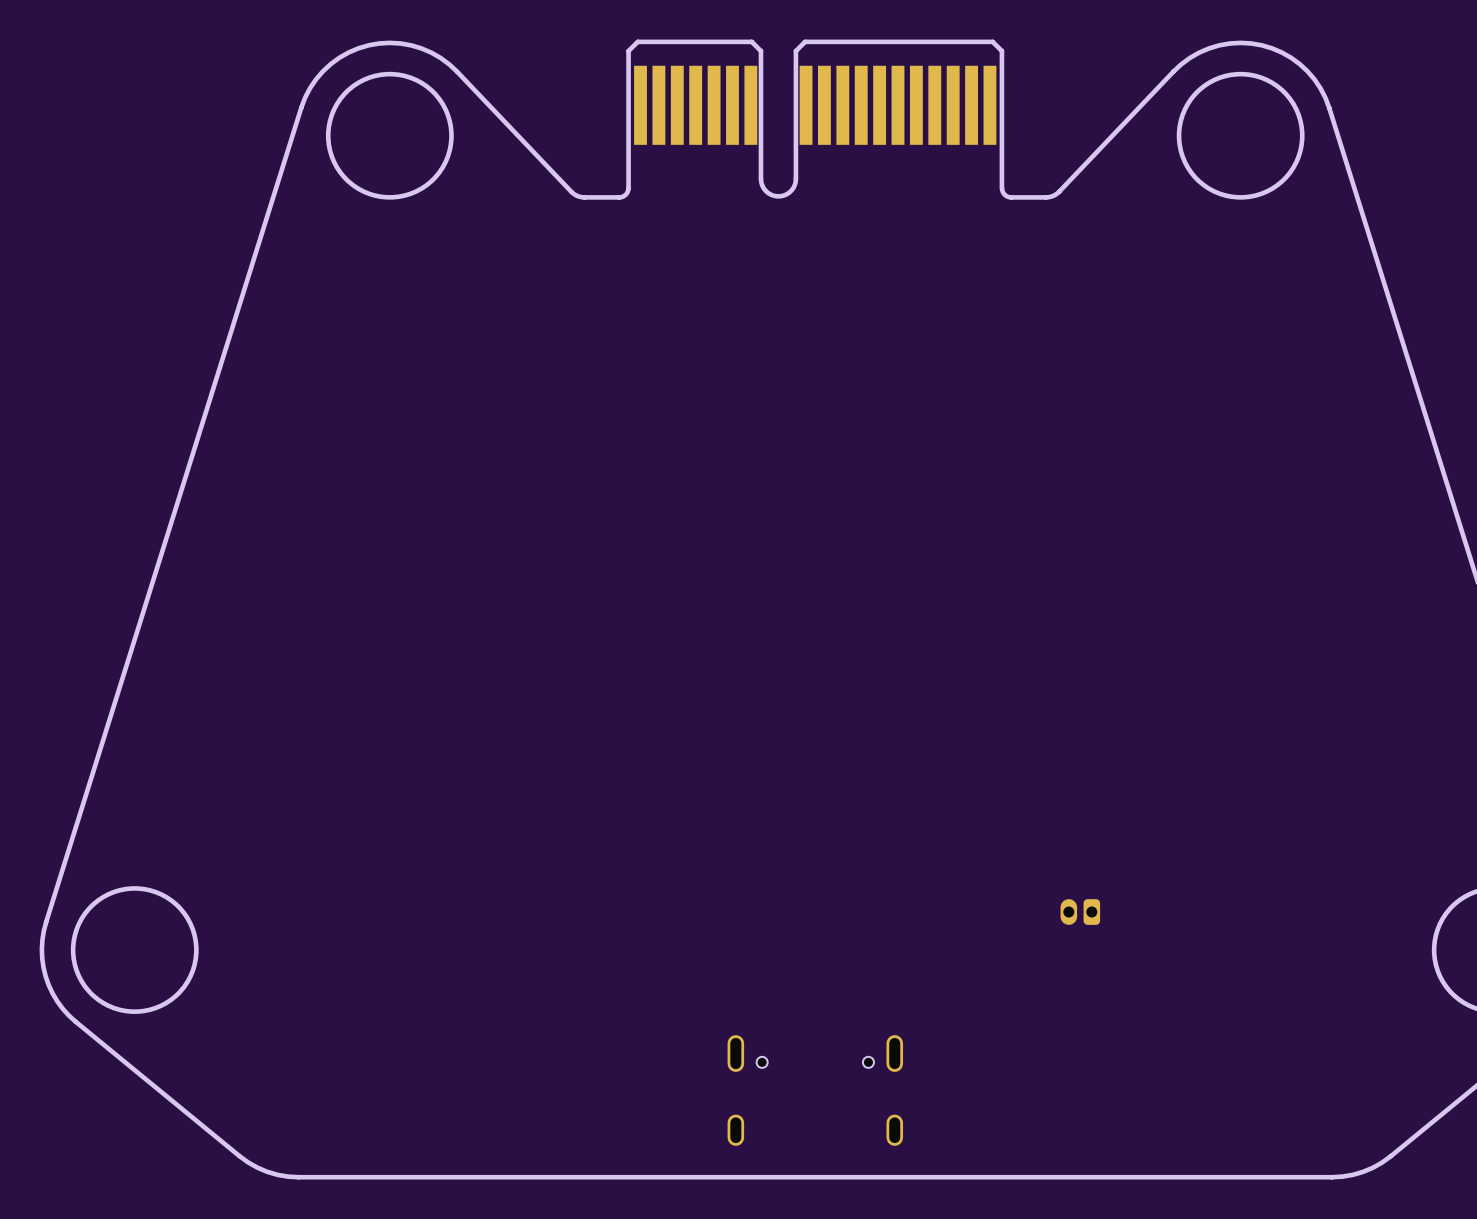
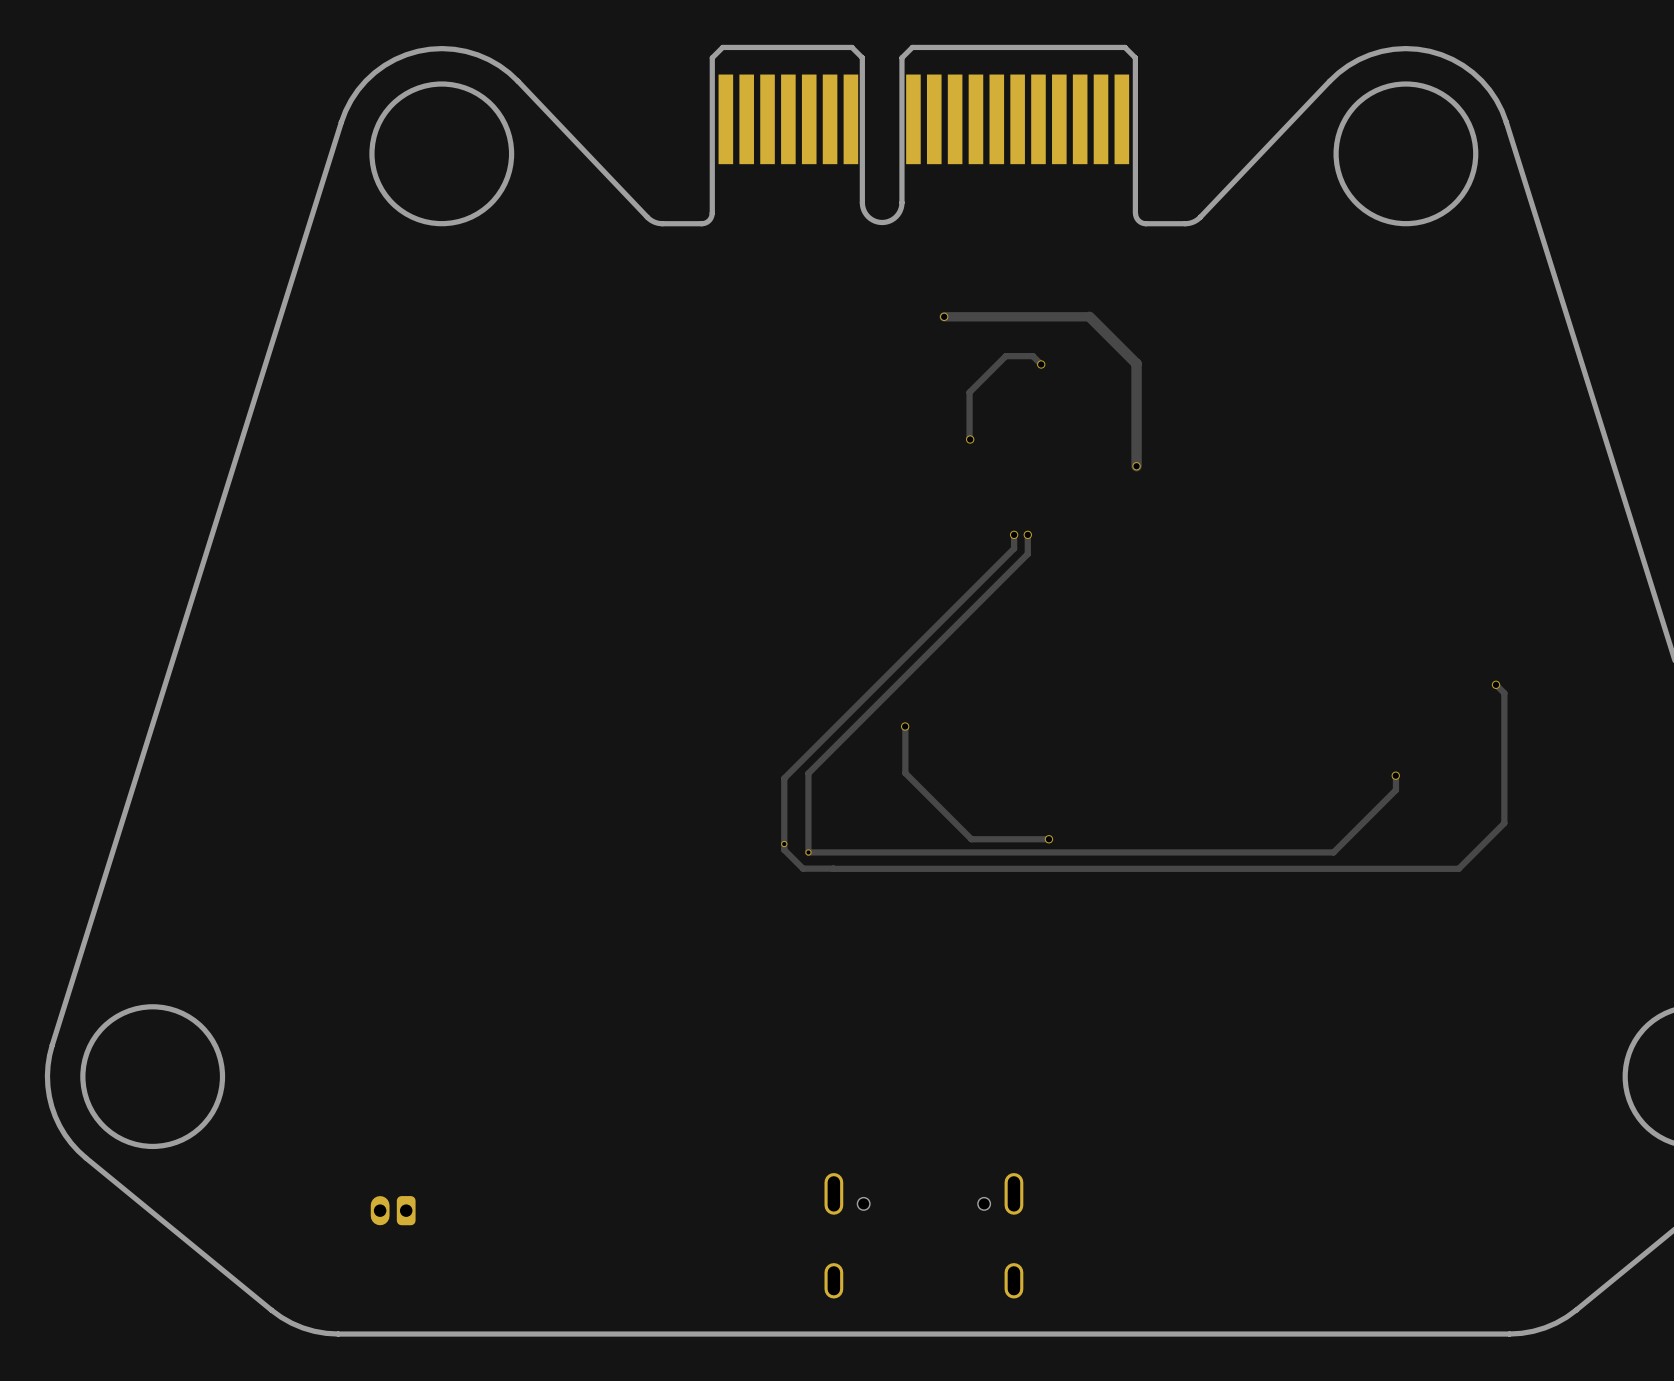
track: none -> (944, 316) (1089, 316) (1136, 363) (1136, 466)
via: none -> (944, 316)
track: none -> (1041, 364) (1032, 356) (1005, 356) (969, 392) (970, 439)
via: none -> (1041, 364)
via: none -> (970, 439)
via: none -> (1136, 466)
track: none -> (1014, 534) (1014, 548) (784, 778) (784, 849) (803, 868) (833, 868)
via: none -> (1014, 534)
track: none -> (1027, 534) (1027, 554) (808, 773) (808, 852) (1333, 852) (1395, 790) (1395, 778)
via: none -> (1027, 534)
track: none -> (1496, 684) (1504, 693) (1504, 823) (1458, 868) (833, 868)
via: none -> (1496, 684)
via: none -> (905, 726)
track: none -> (905, 728) (905, 773) (971, 839) (1048, 839)
via: none -> (1395, 775)
via: none -> (1048, 839)
via: none -> (784, 844)
via: none -> (808, 852)
part: (1080, 912) -> none
part: none -> (393, 1210)

